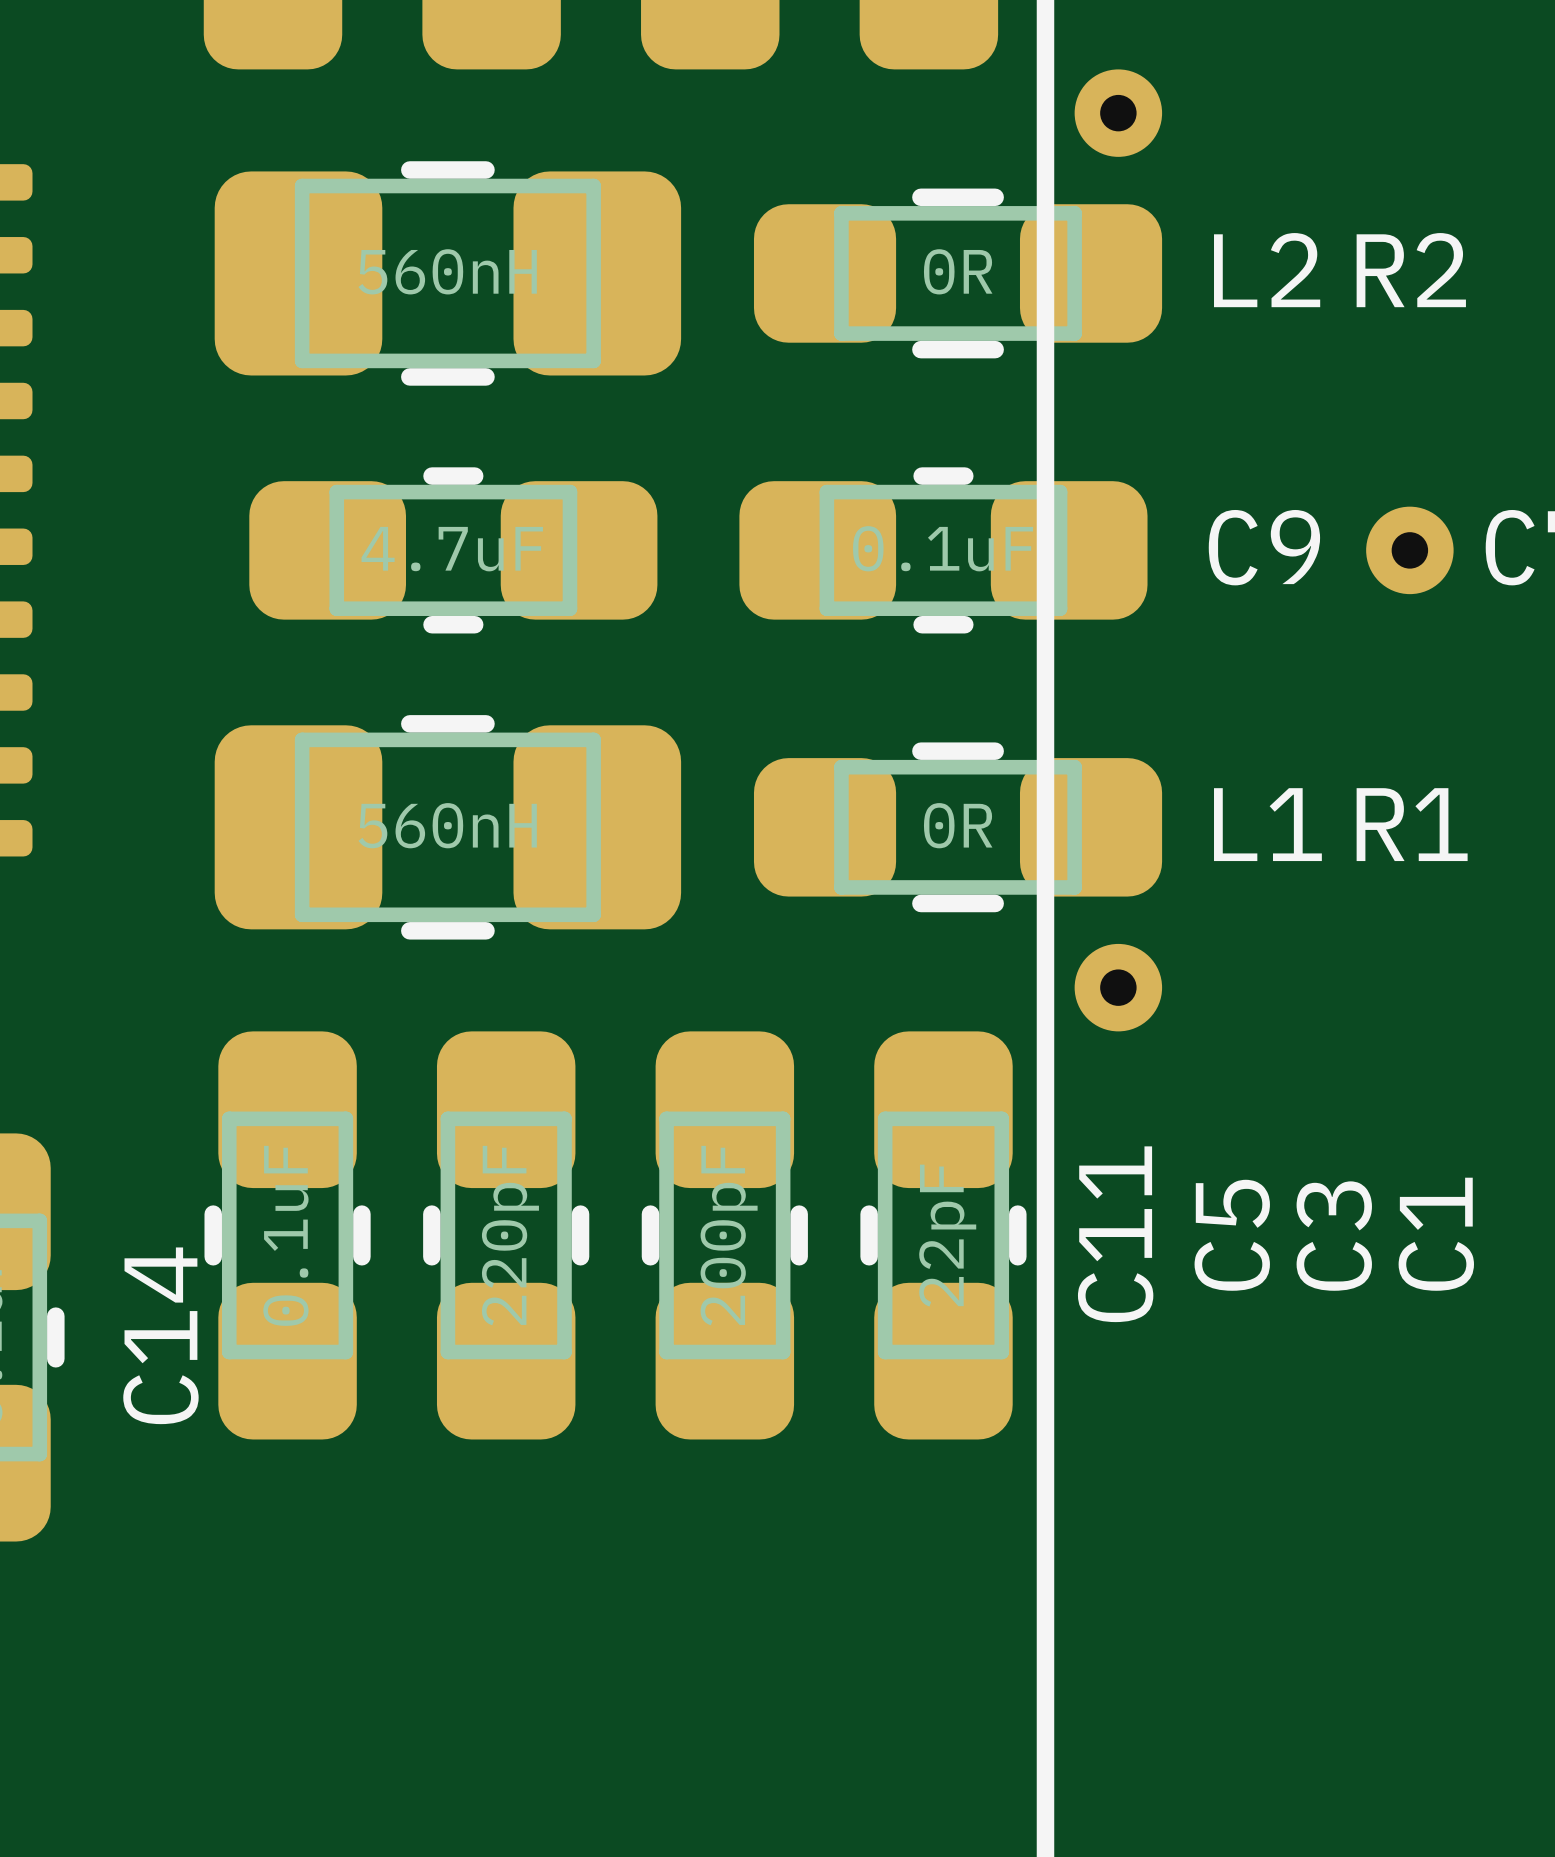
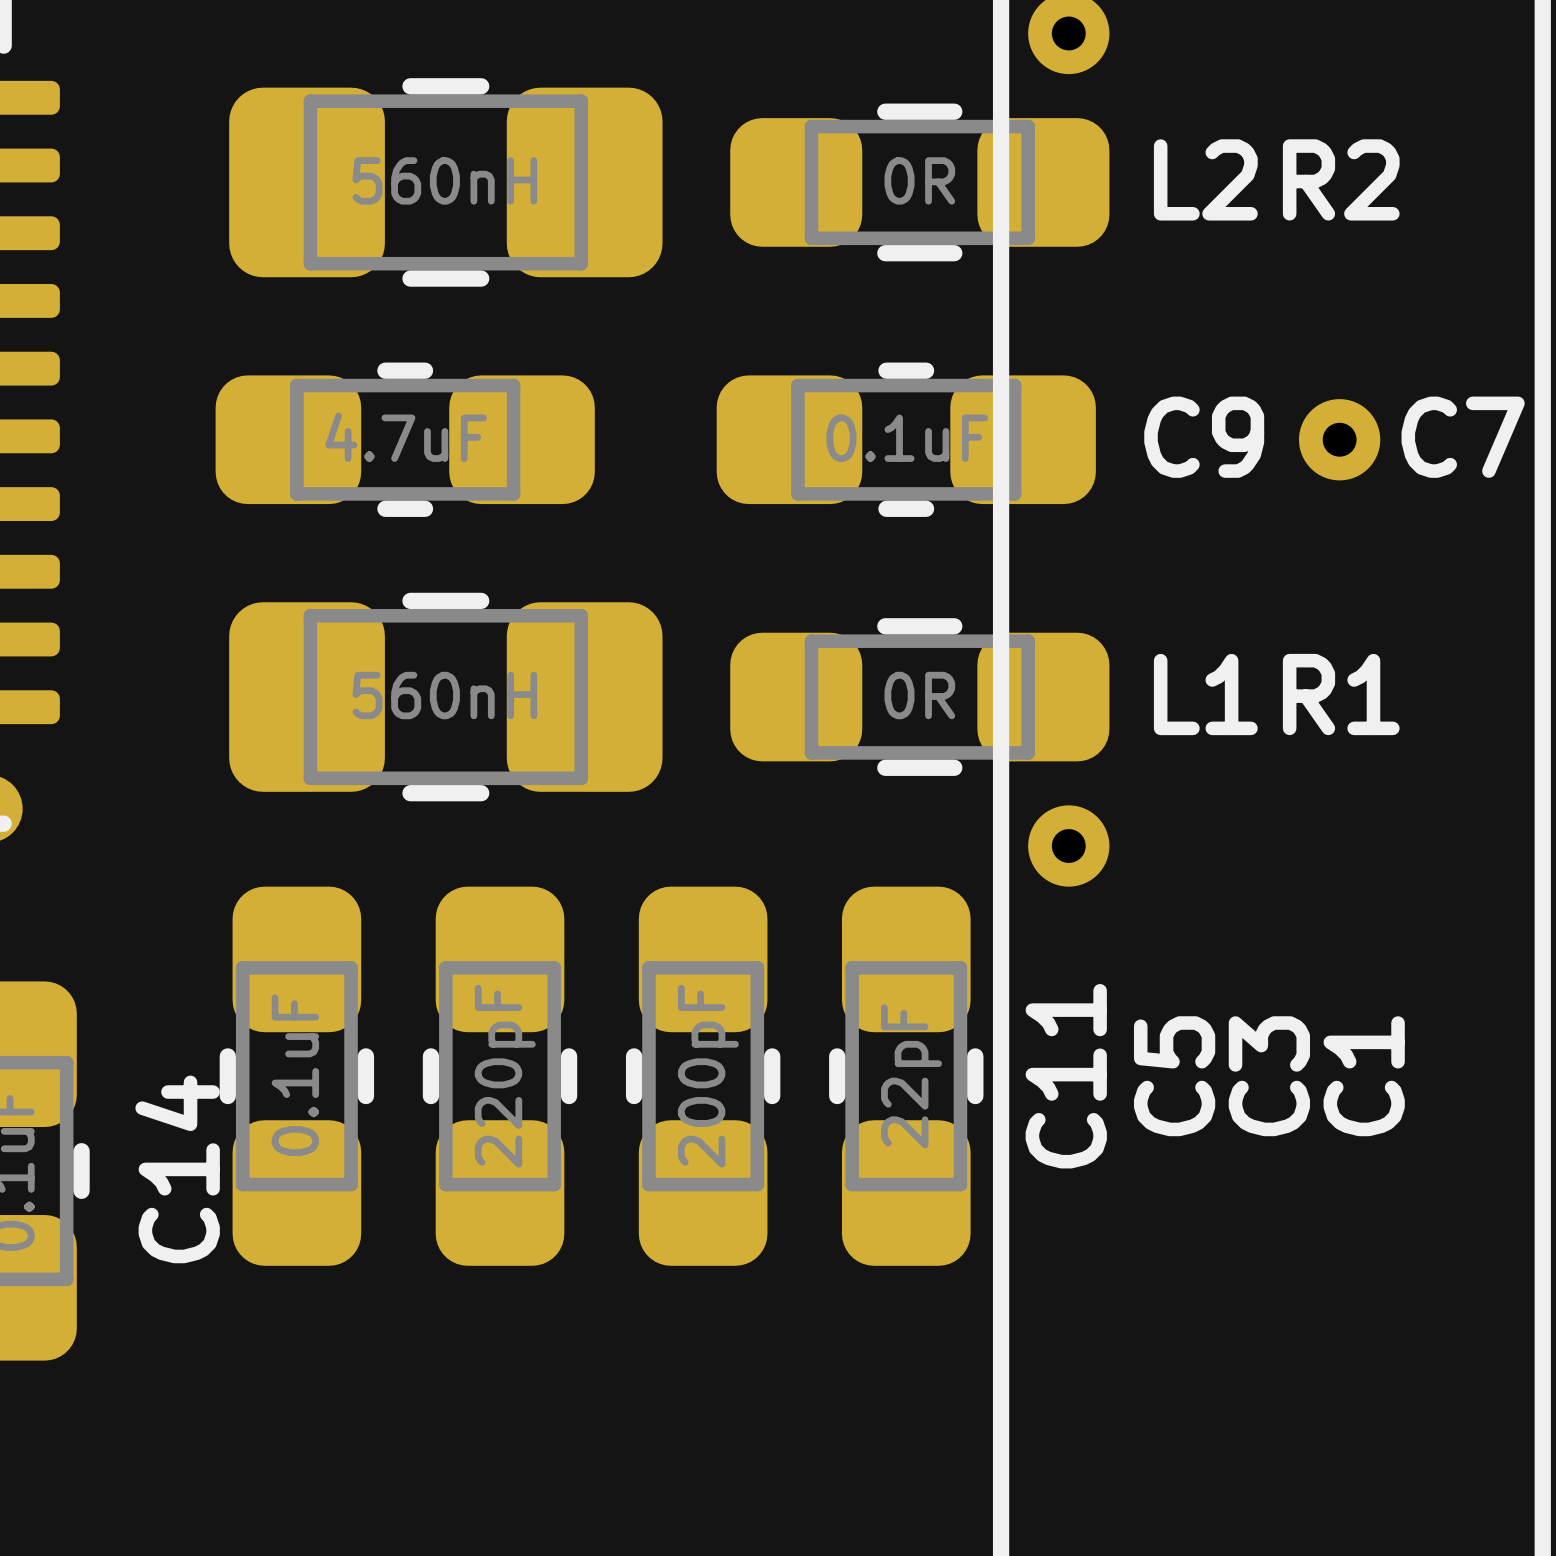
C9 position: (453, 550) -> (405, 439)

